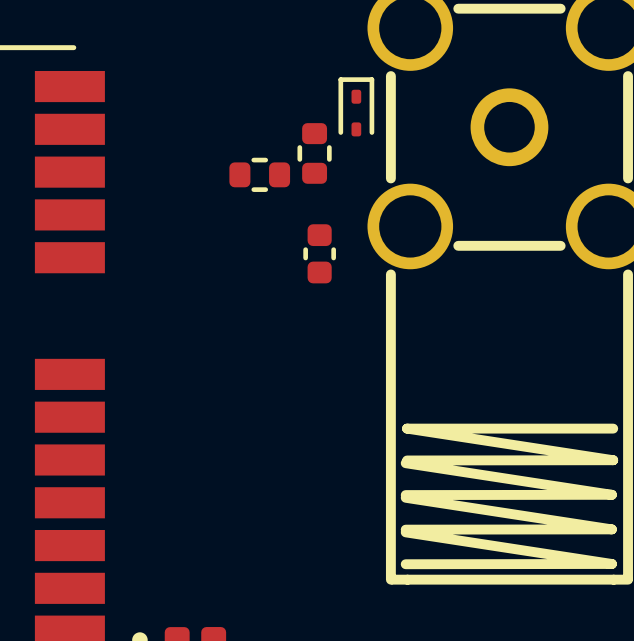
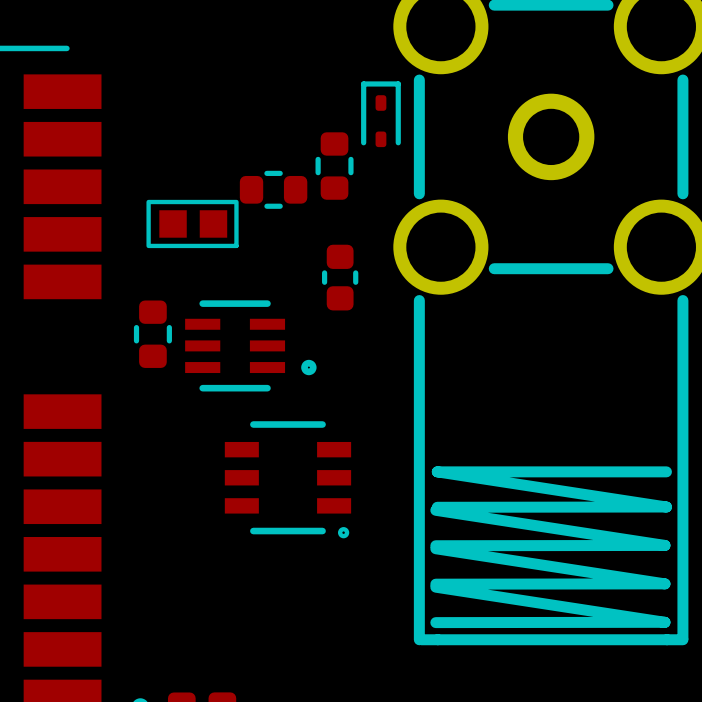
part: none -> (192, 223)
part: none -> (152, 334)
part: none -> (250, 345)
part: none -> (287, 477)
drawing: none -> [337, 527, 350, 539]

